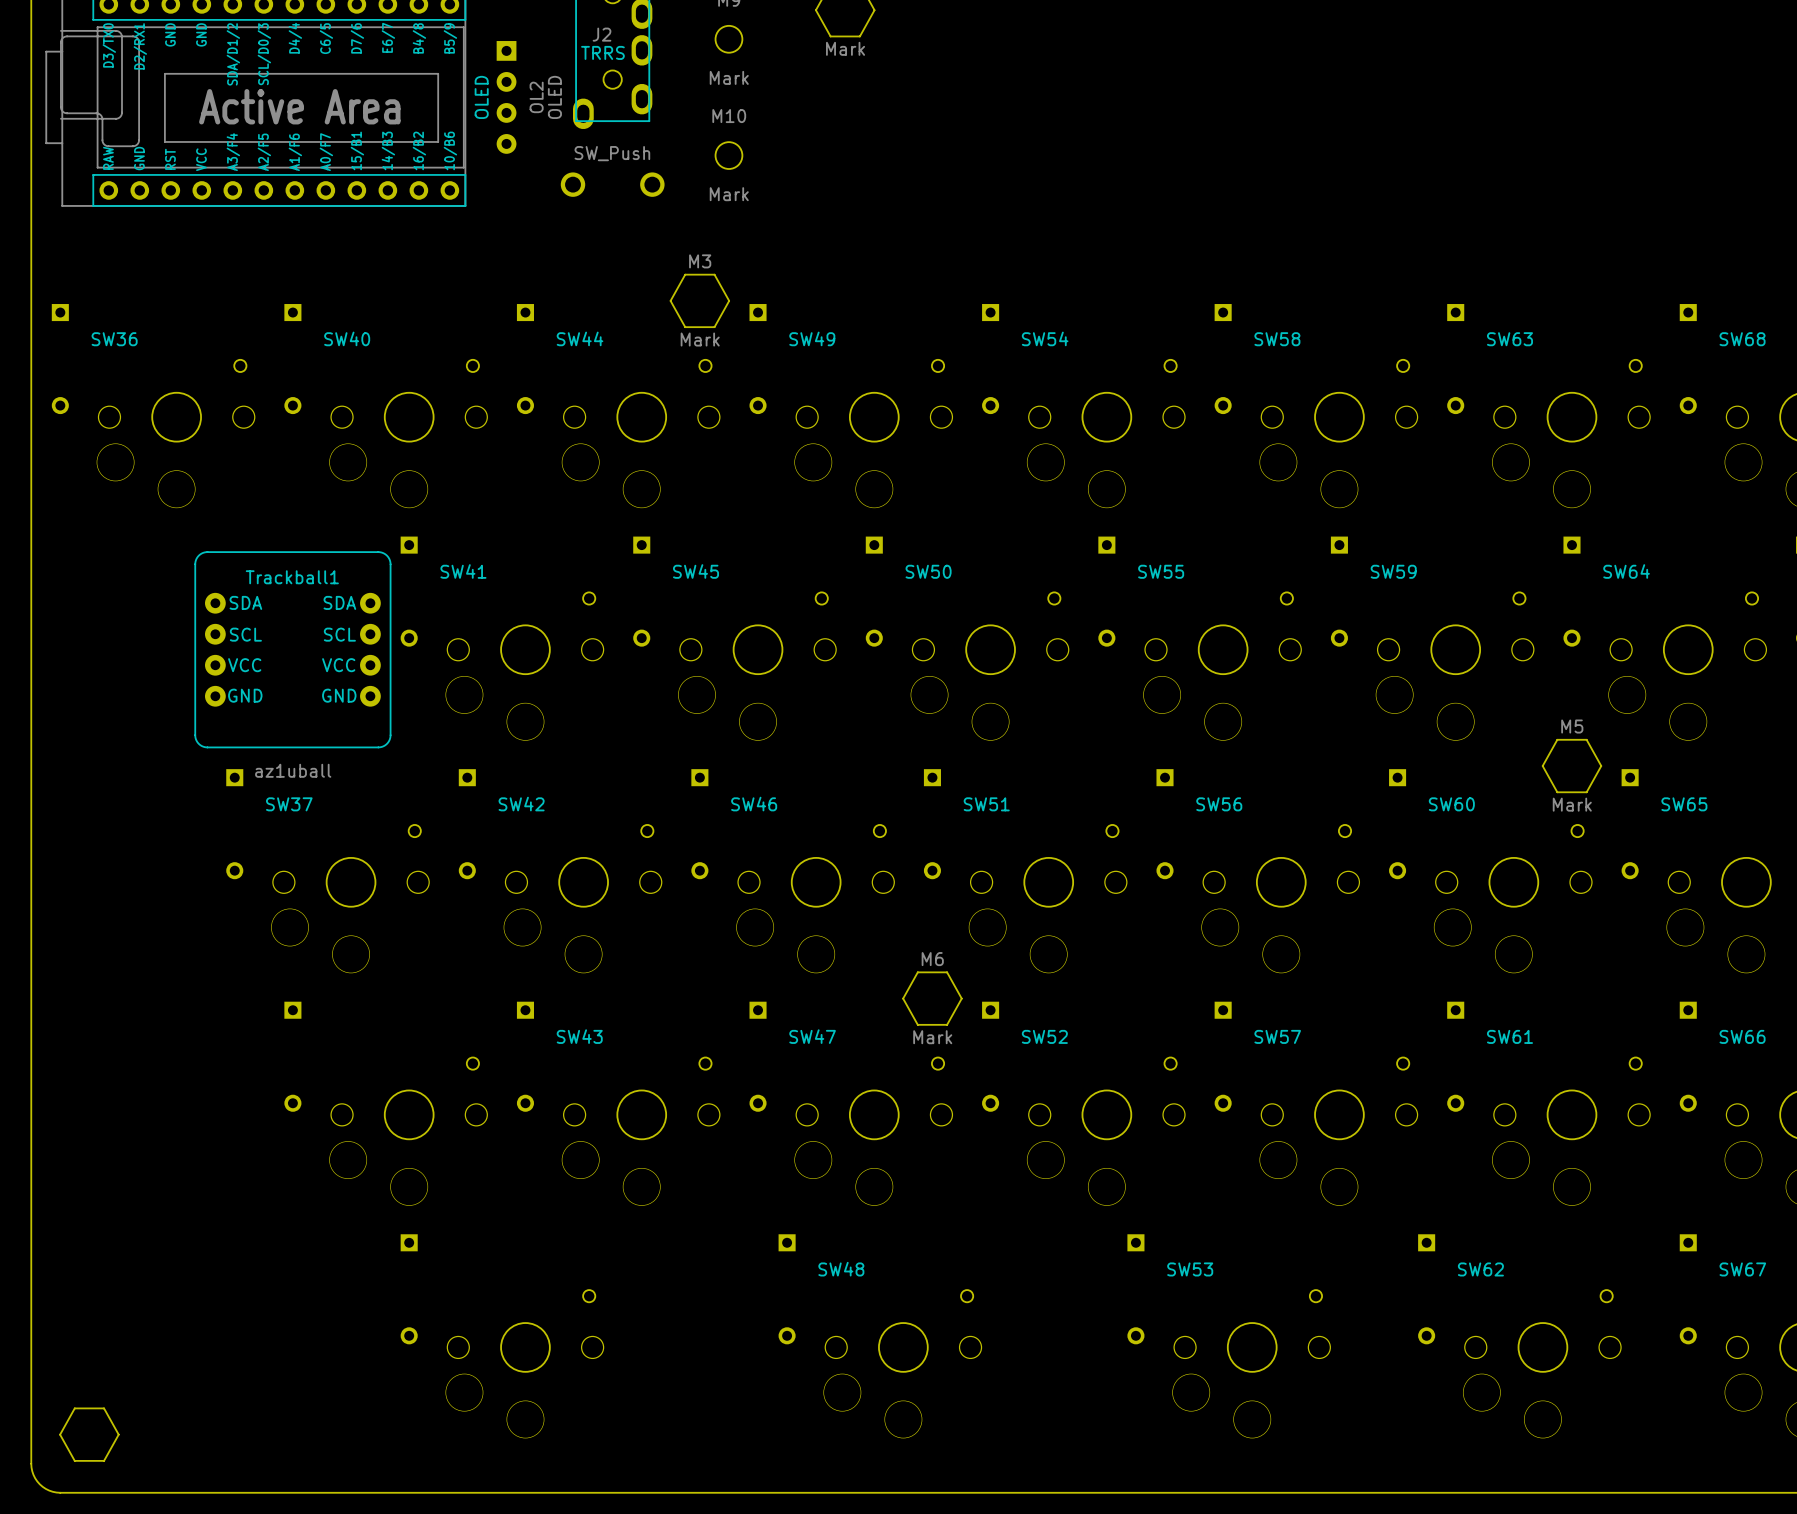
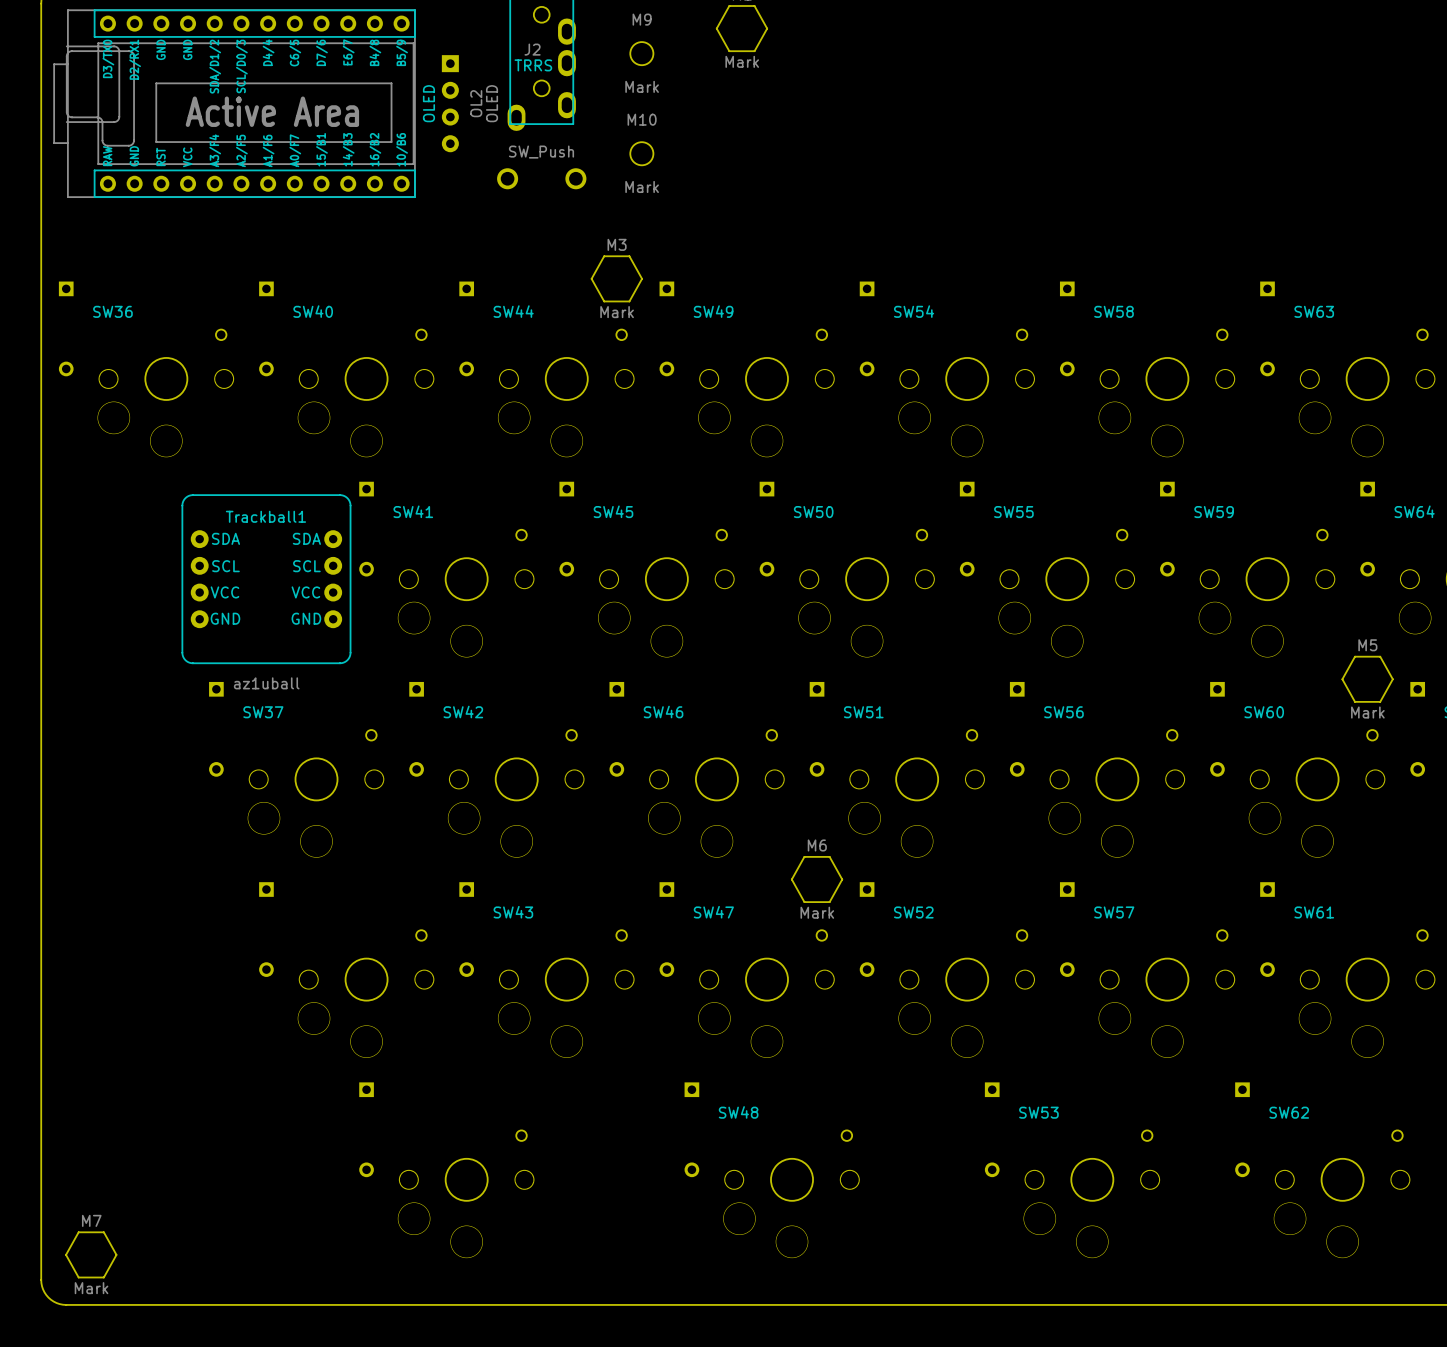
M7: none -> Mark (91, 1254)

